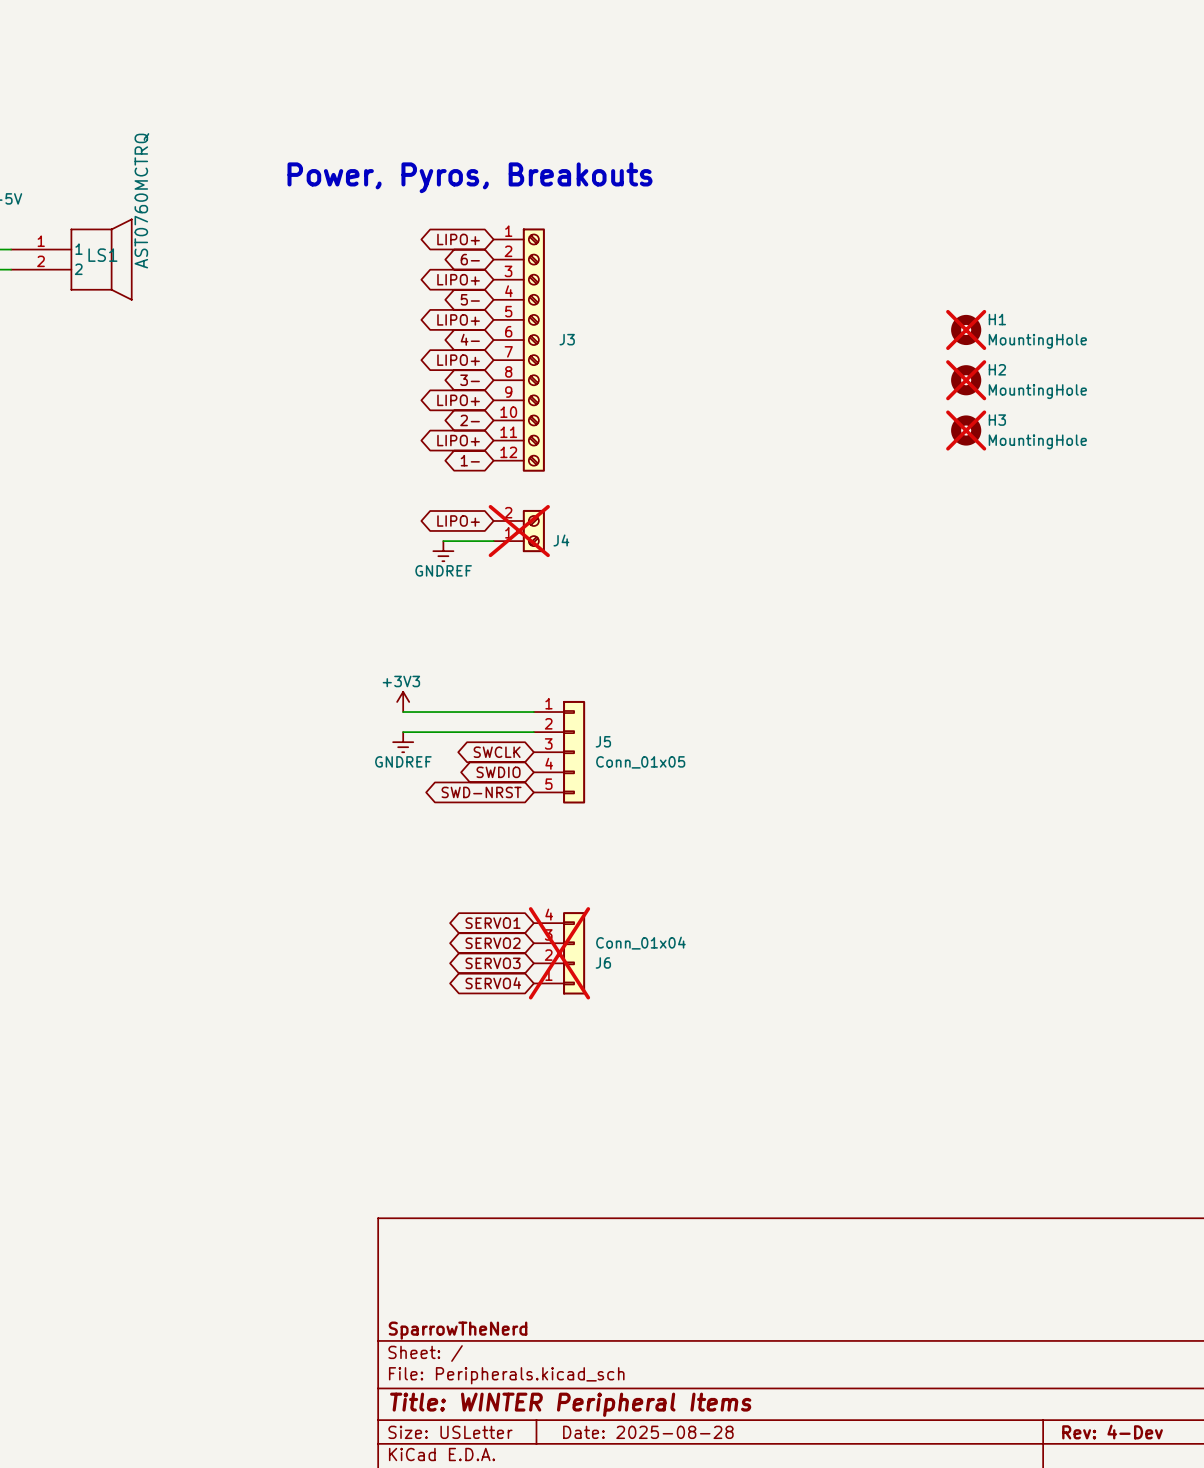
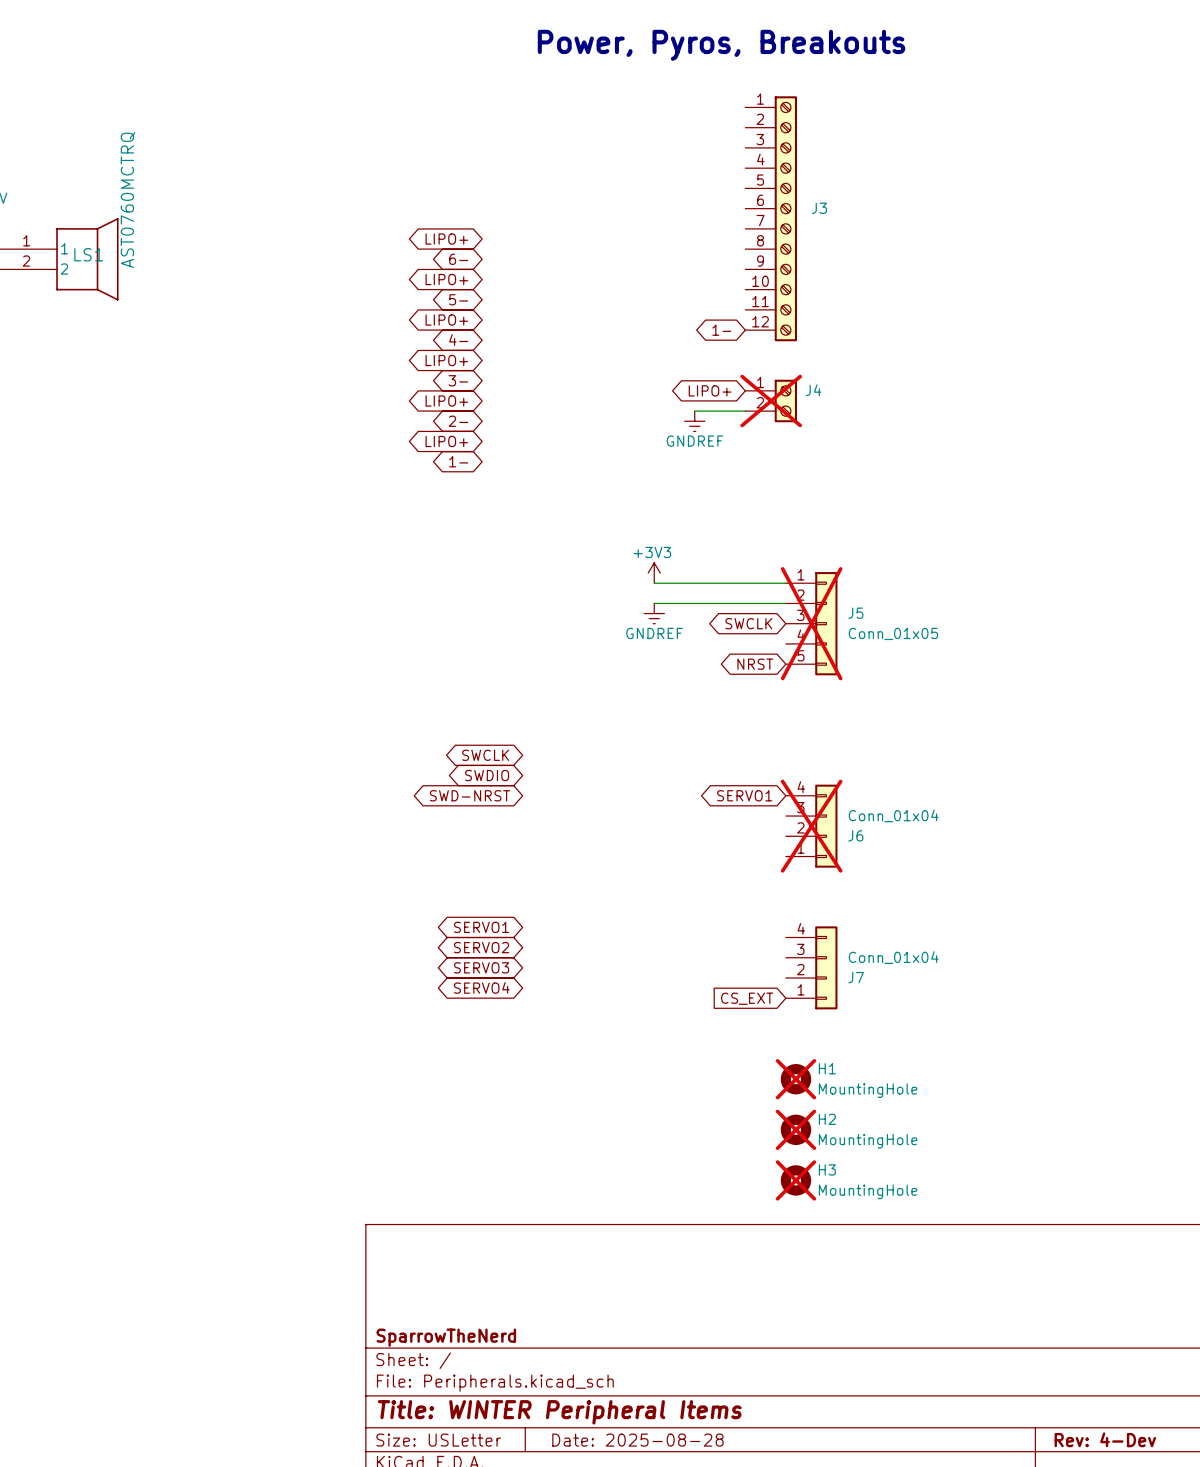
text: none -> Power, Pyros, Breakouts (721, 45)
text: Power, Pyros, Breakouts (470, 177) -> none
global label: none -> 1- (721, 330)
H1 position: (966, 329) -> (795, 1079)
J3 position: (519, 350) -> (771, 218)
H2 position: (966, 380) -> (795, 1129)
global label: none -> LIPO+ (710, 390)
wire: none -> (694, 411) (745, 411)
power symbol: none -> GNDREF (694, 421)
H3 position: (966, 430) -> (795, 1180)
global label: LIPO+ (458, 520) -> none
J4 position: (519, 531) -> (771, 400)
J4 flip: as is (533, 531) -> up-down (785, 400)
wire: (443, 541) (493, 541) -> none
power symbol: GNDREF (443, 551) -> none
power symbol: none -> +3V3 (654, 573)
wire: none -> (654, 583) (785, 583)
wire: none -> (654, 603) (785, 603)
power symbol: none -> GNDREF (654, 613)
global label: none -> SWCLK (748, 623)
J5 do-not-place cross: none -> (811, 623)
global label: none -> NRST (755, 664)
power symbol: +3V3 (403, 701) -> none
wire: (403, 712) (533, 712) -> none
wire: (403, 732) (533, 732) -> none
power symbol: GNDREF (403, 742) -> none
J5 position: (559, 752) -> (811, 623)
global label: none -> SERVO1 (744, 795)
J6 position: (559, 953) -> (811, 826)
J7: none -> Conn_01x04 (811, 967)
global label: none -> CS_EXT (747, 998)

